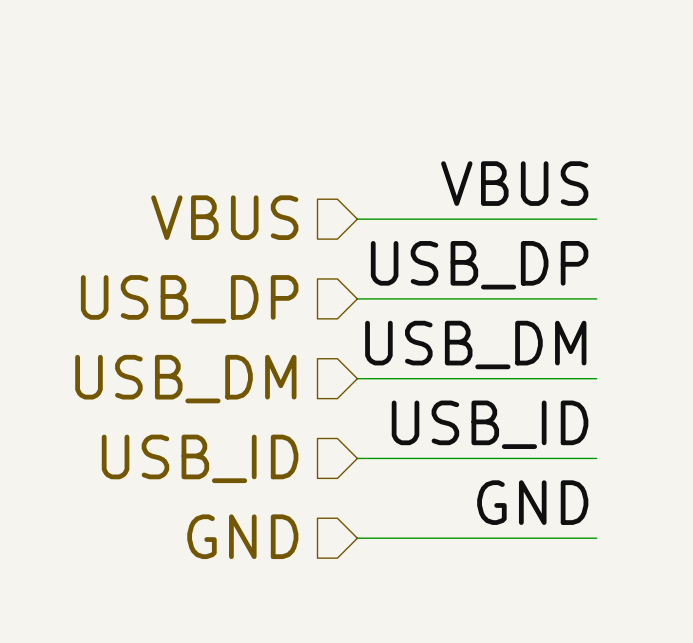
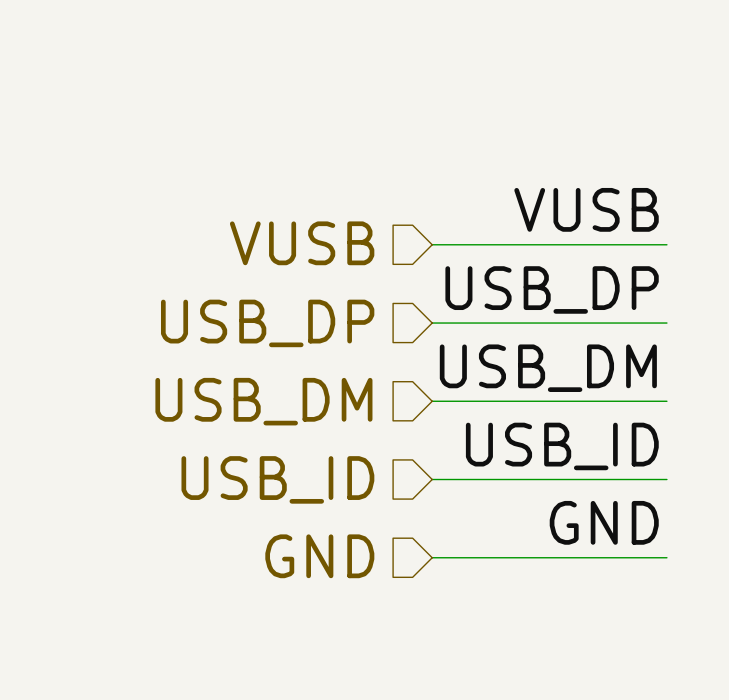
label: VBUS (514, 183) -> VUSB (586, 209)
hierarchical label: VBUS (224, 217) -> VUSB (302, 243)

